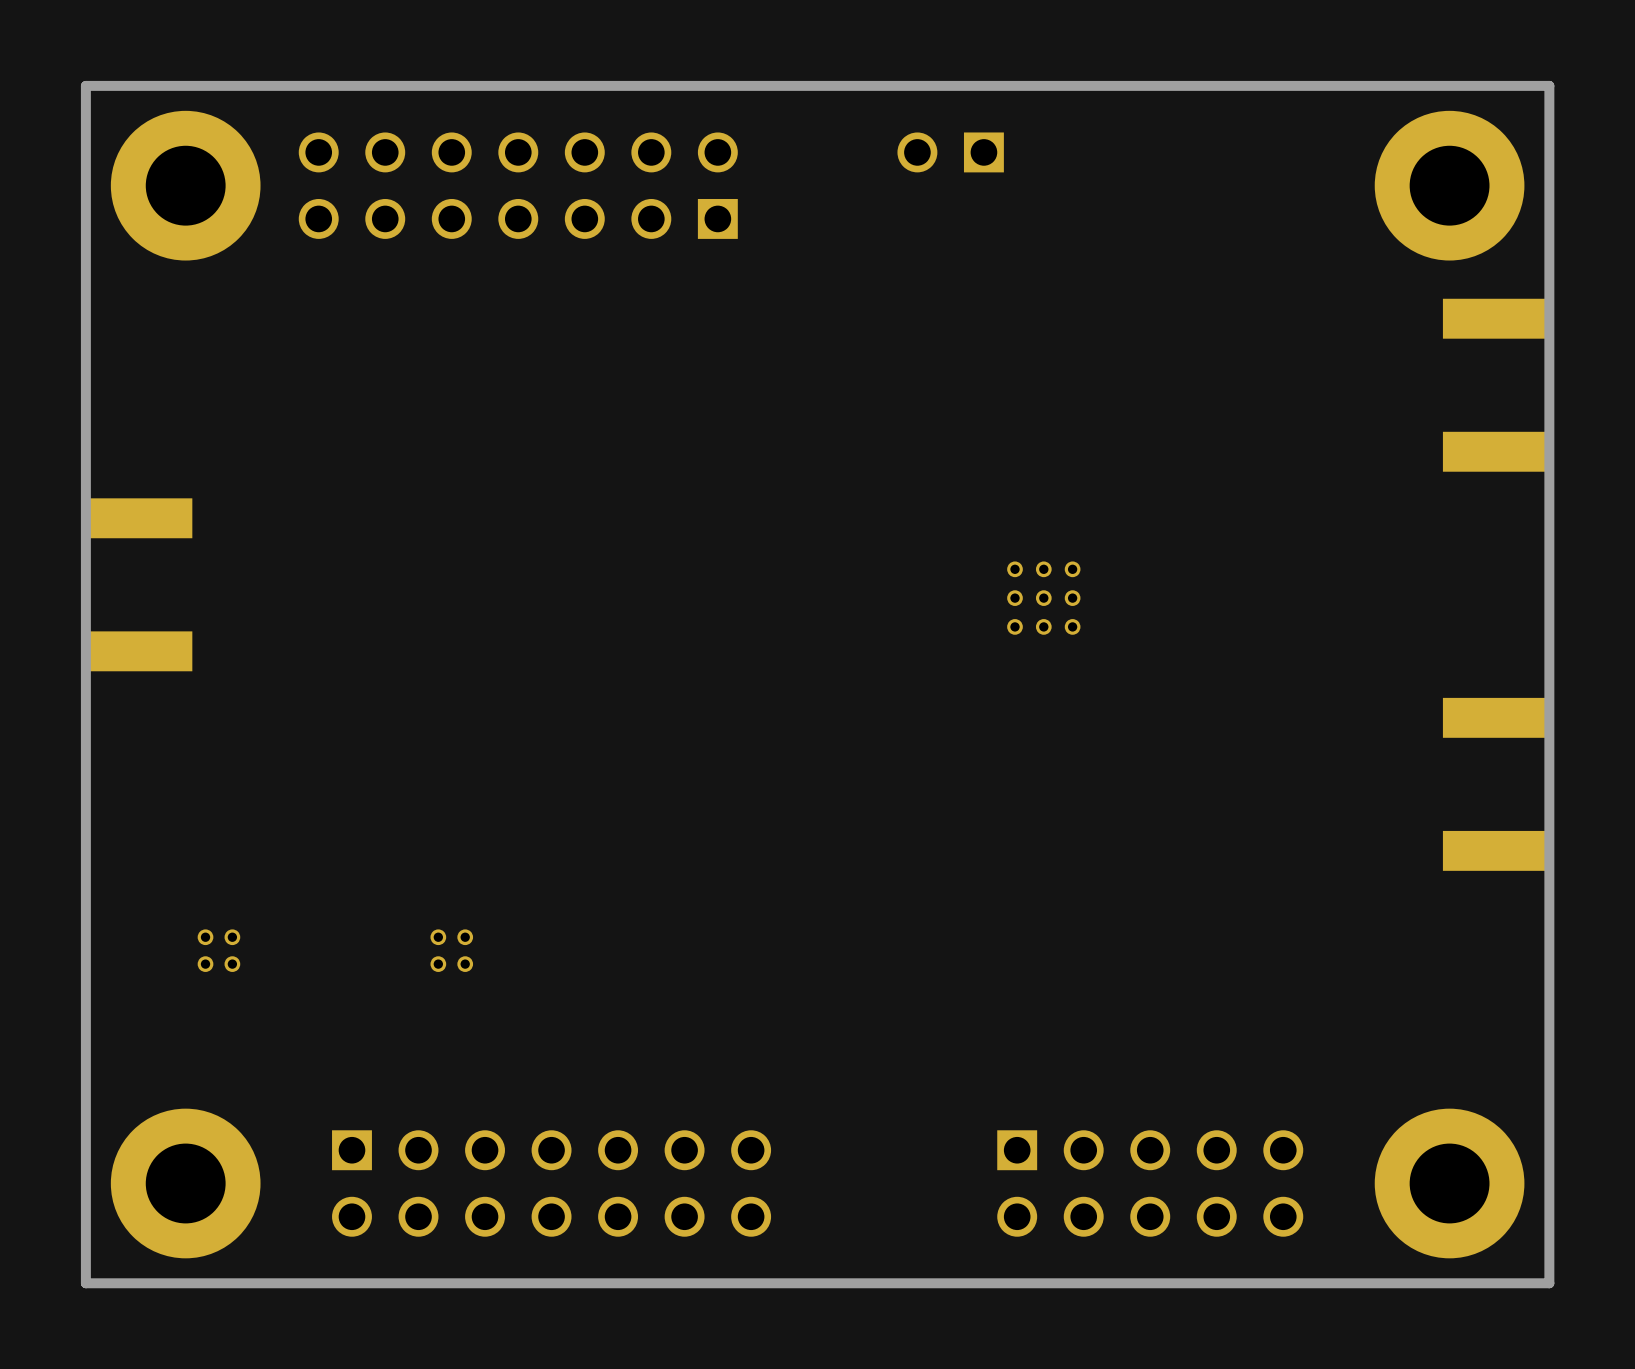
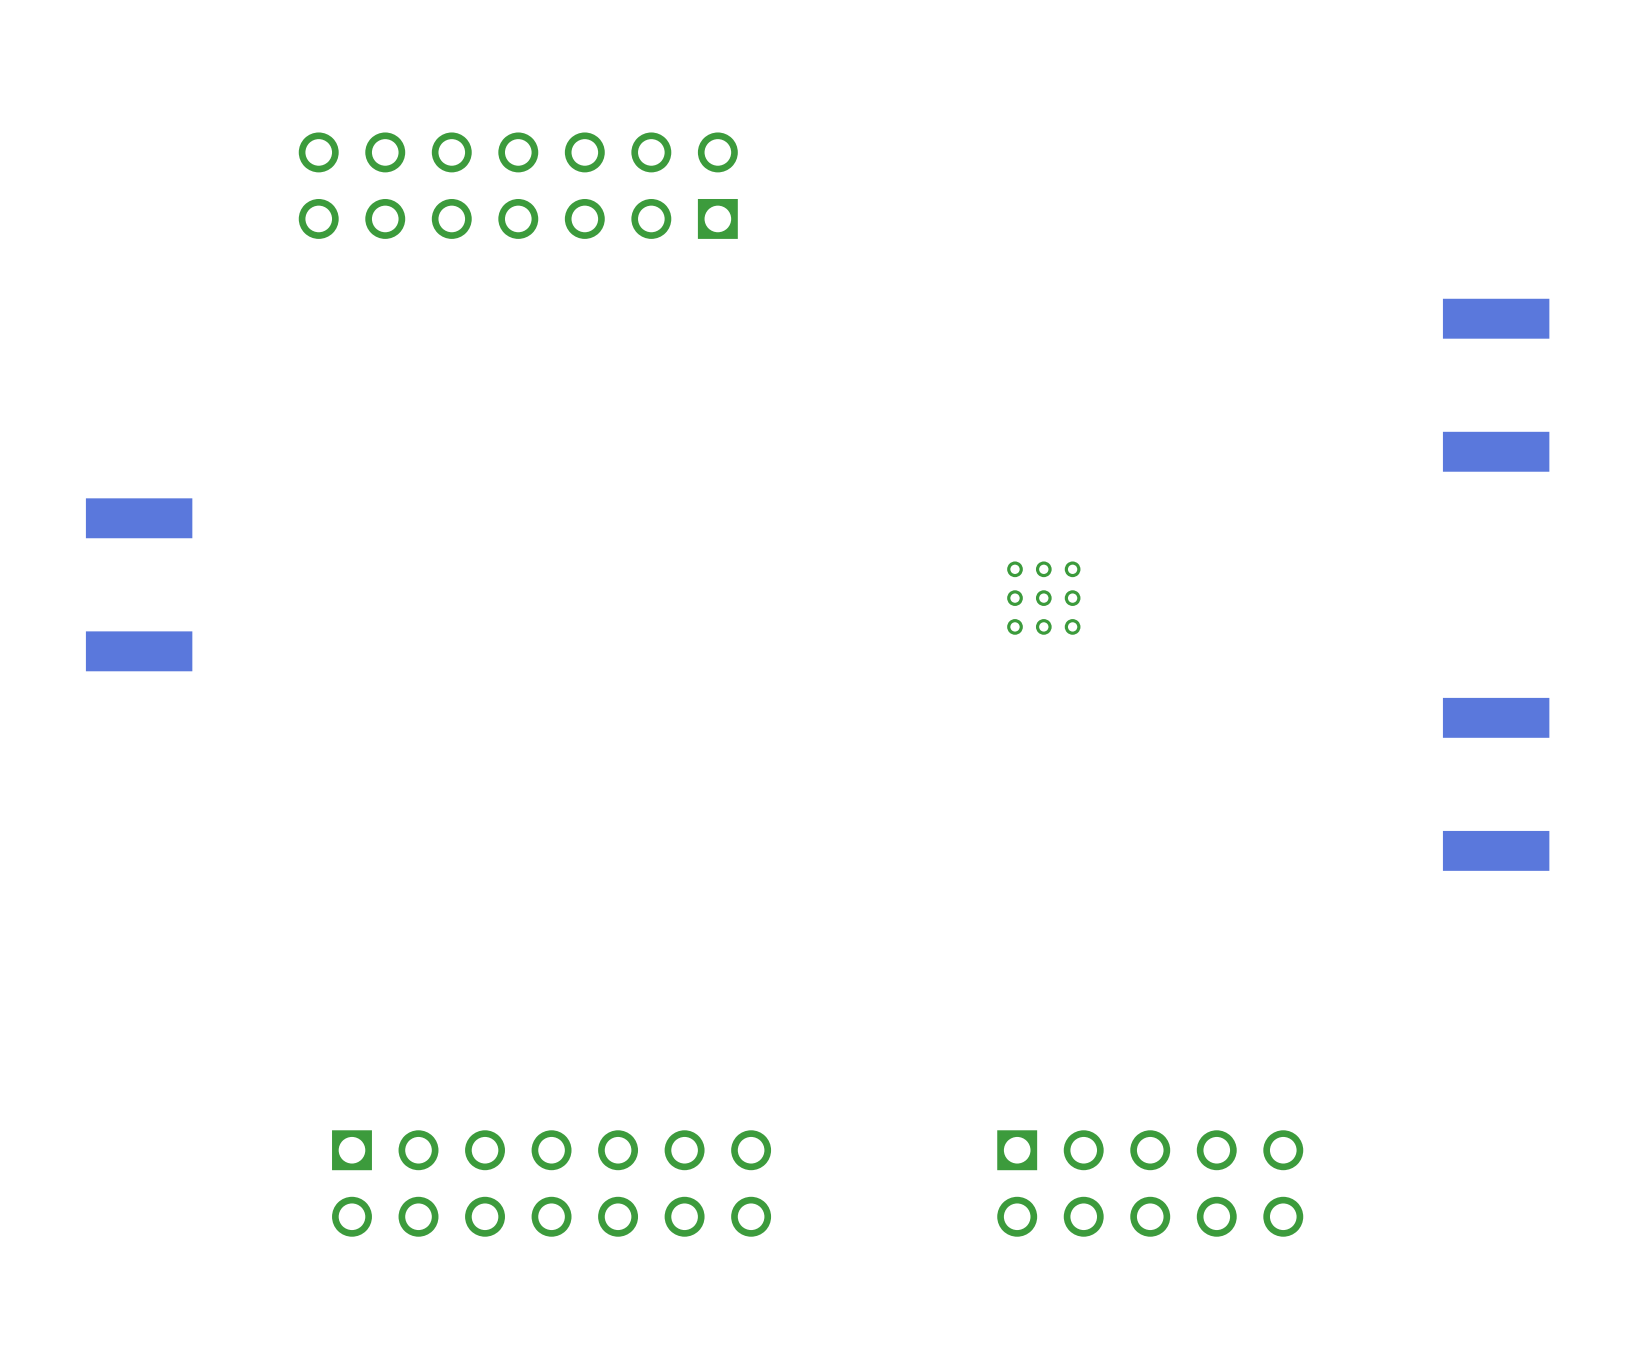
board edge: (1549, 85) (85, 85) (85, 1283) (1549, 1283) (1549, 85) -> none
part: (950, 152) -> none
part: (185, 185) -> none
part: (1449, 185) -> none
part: (218, 950) -> none
part: (451, 950) -> none
part: (185, 1183) -> none
part: (1449, 1183) -> none

